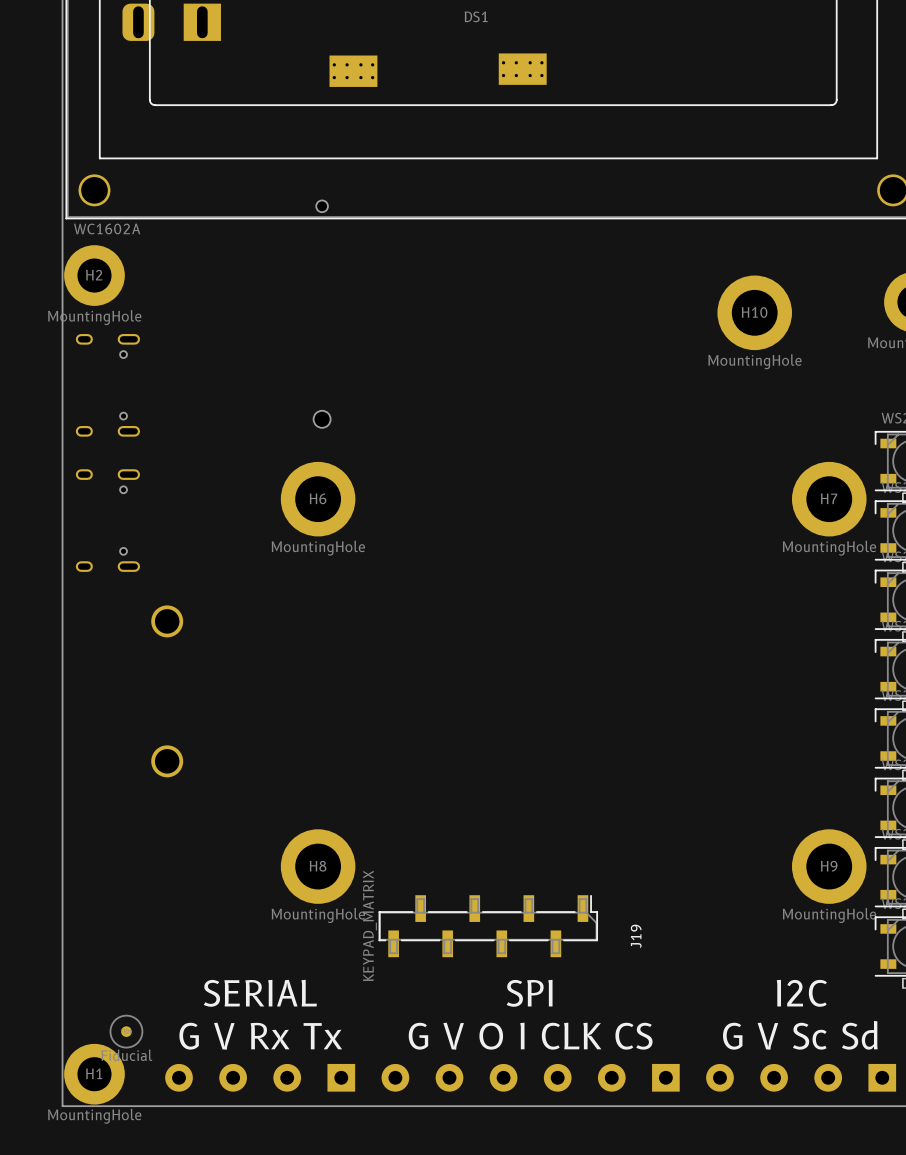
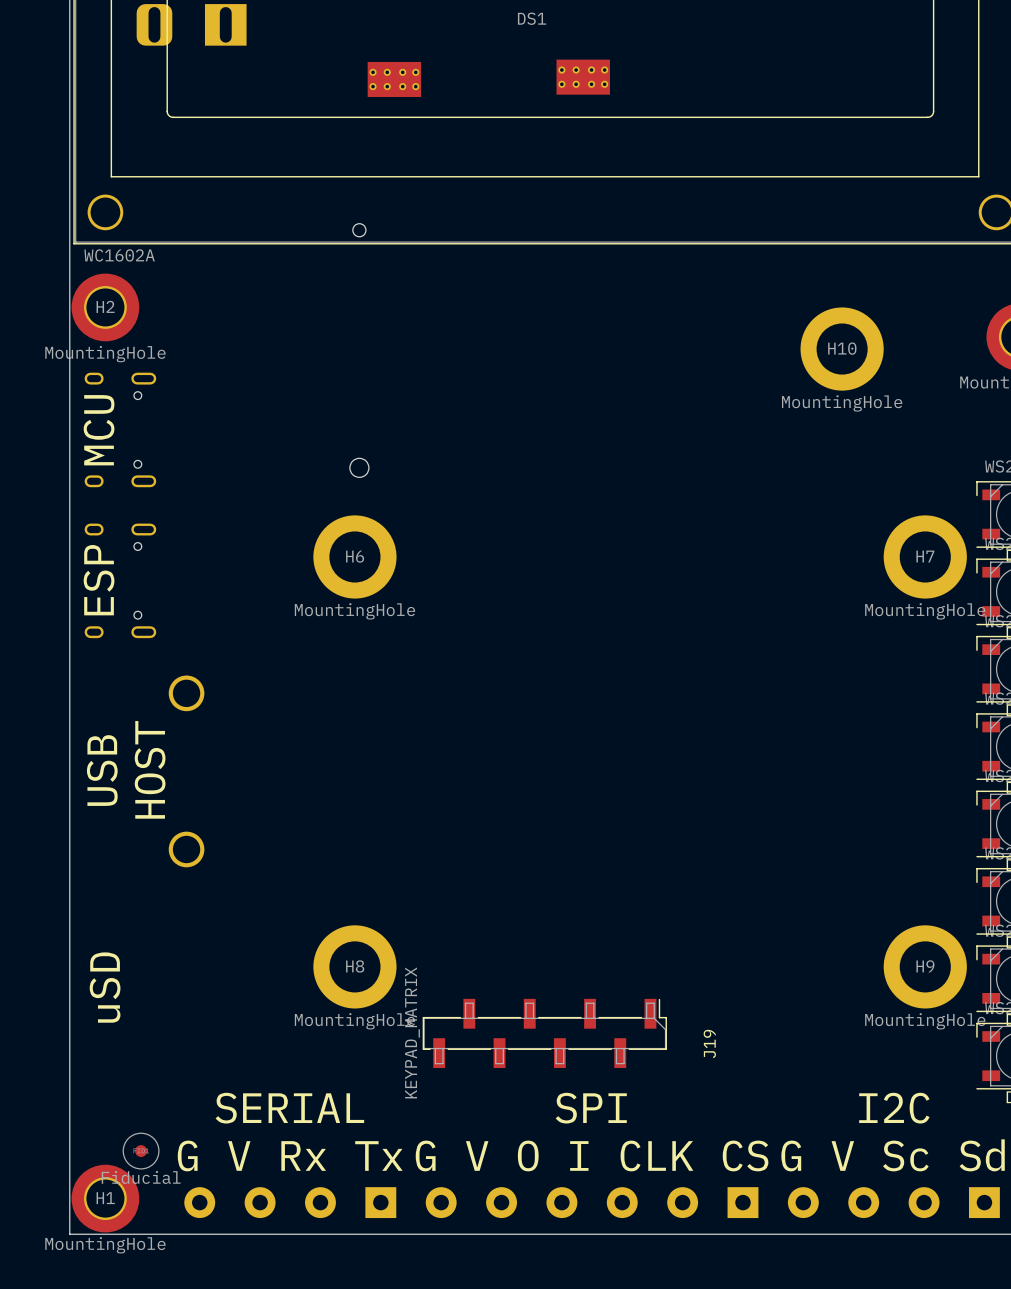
text: none -> MCU (99, 430)
text: none -> ESP (99, 580)
text: none -> HOST (150, 769)
text: none -> USB (102, 770)
text: none -> uSD (105, 987)

